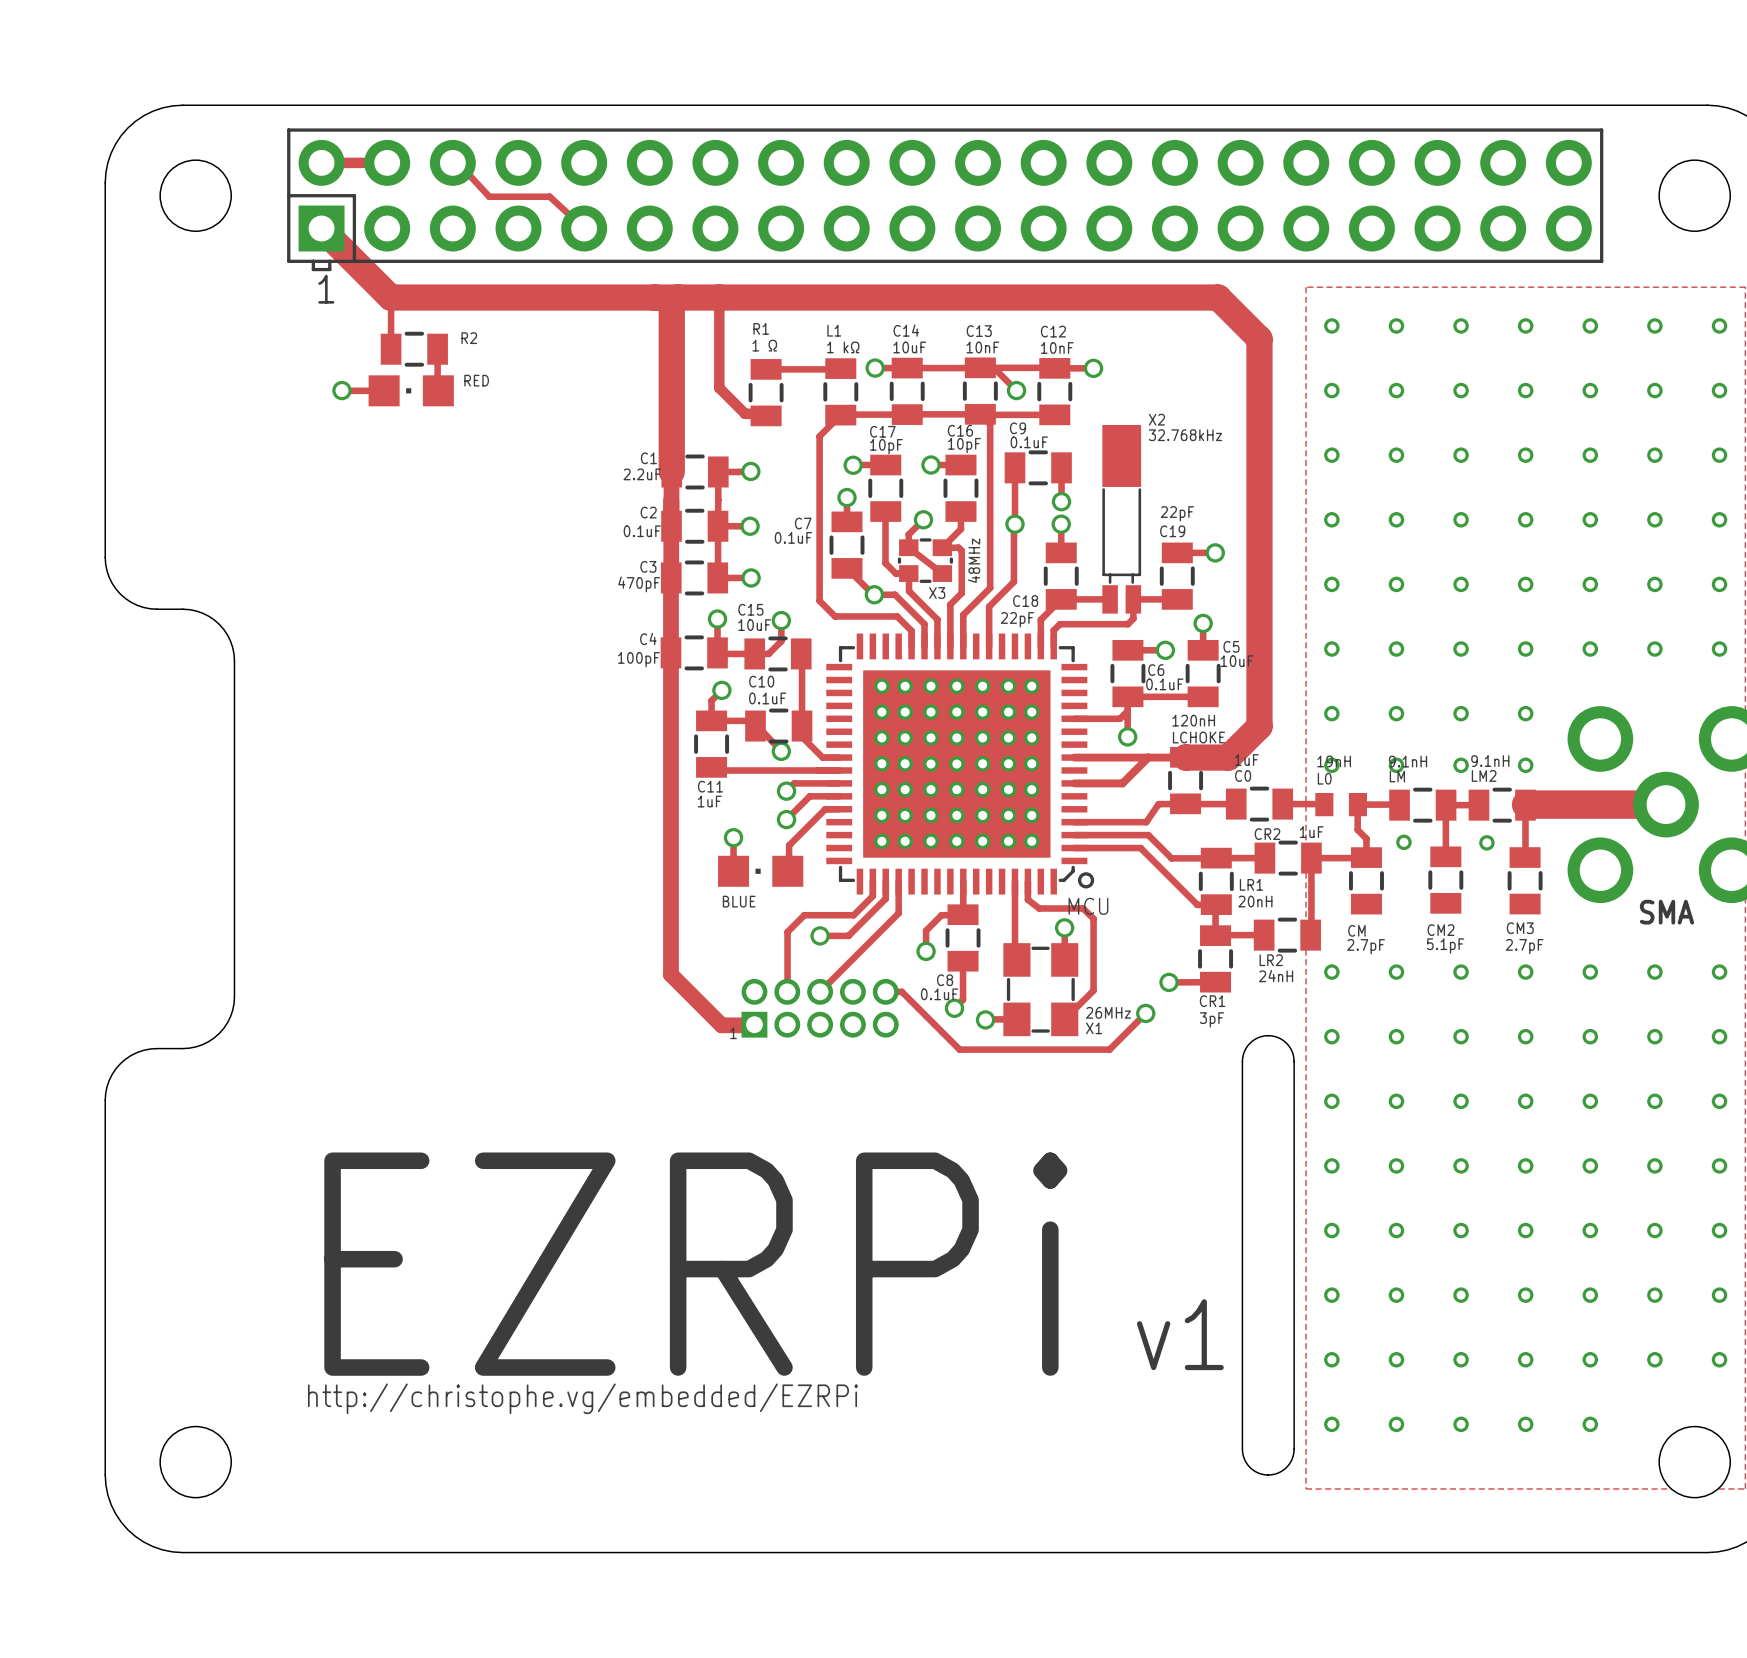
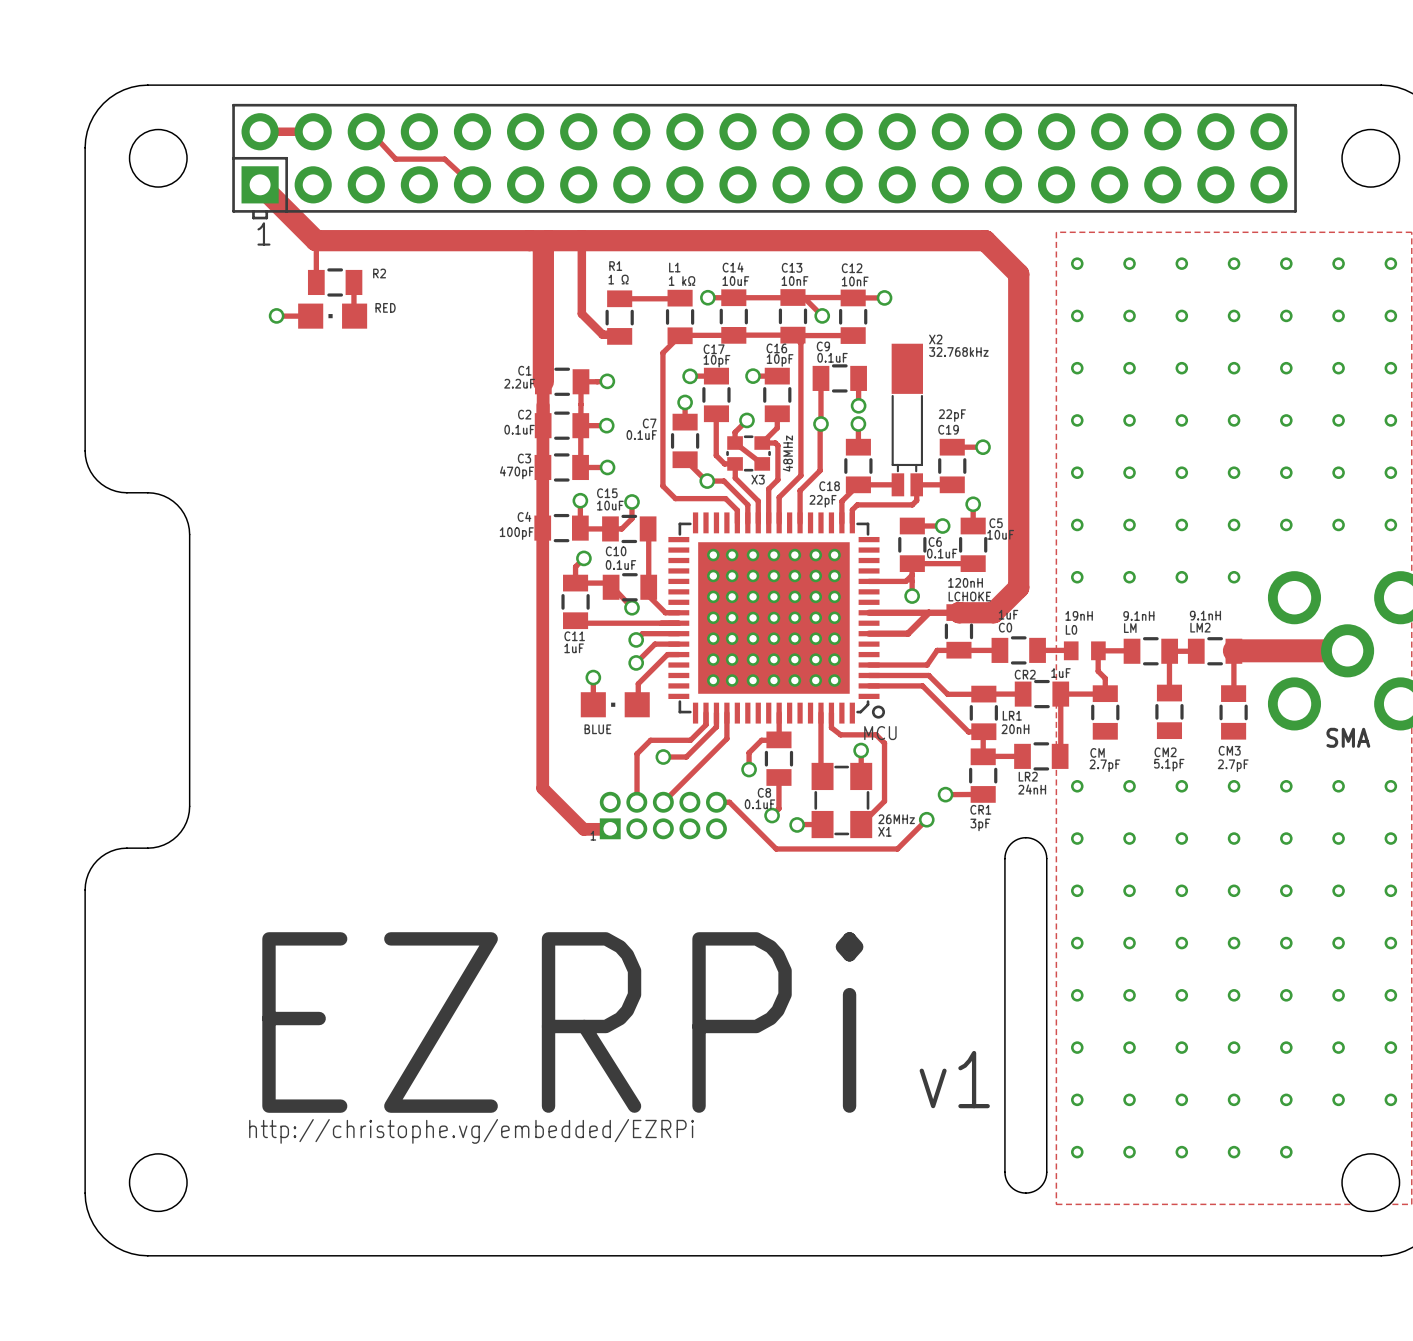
via: (1331, 765) -> none
via: (1396, 765) -> none
via: (1461, 765) -> none
via: (1525, 765) -> none
via: (1403, 842) -> none
via: (1486, 842) -> none

